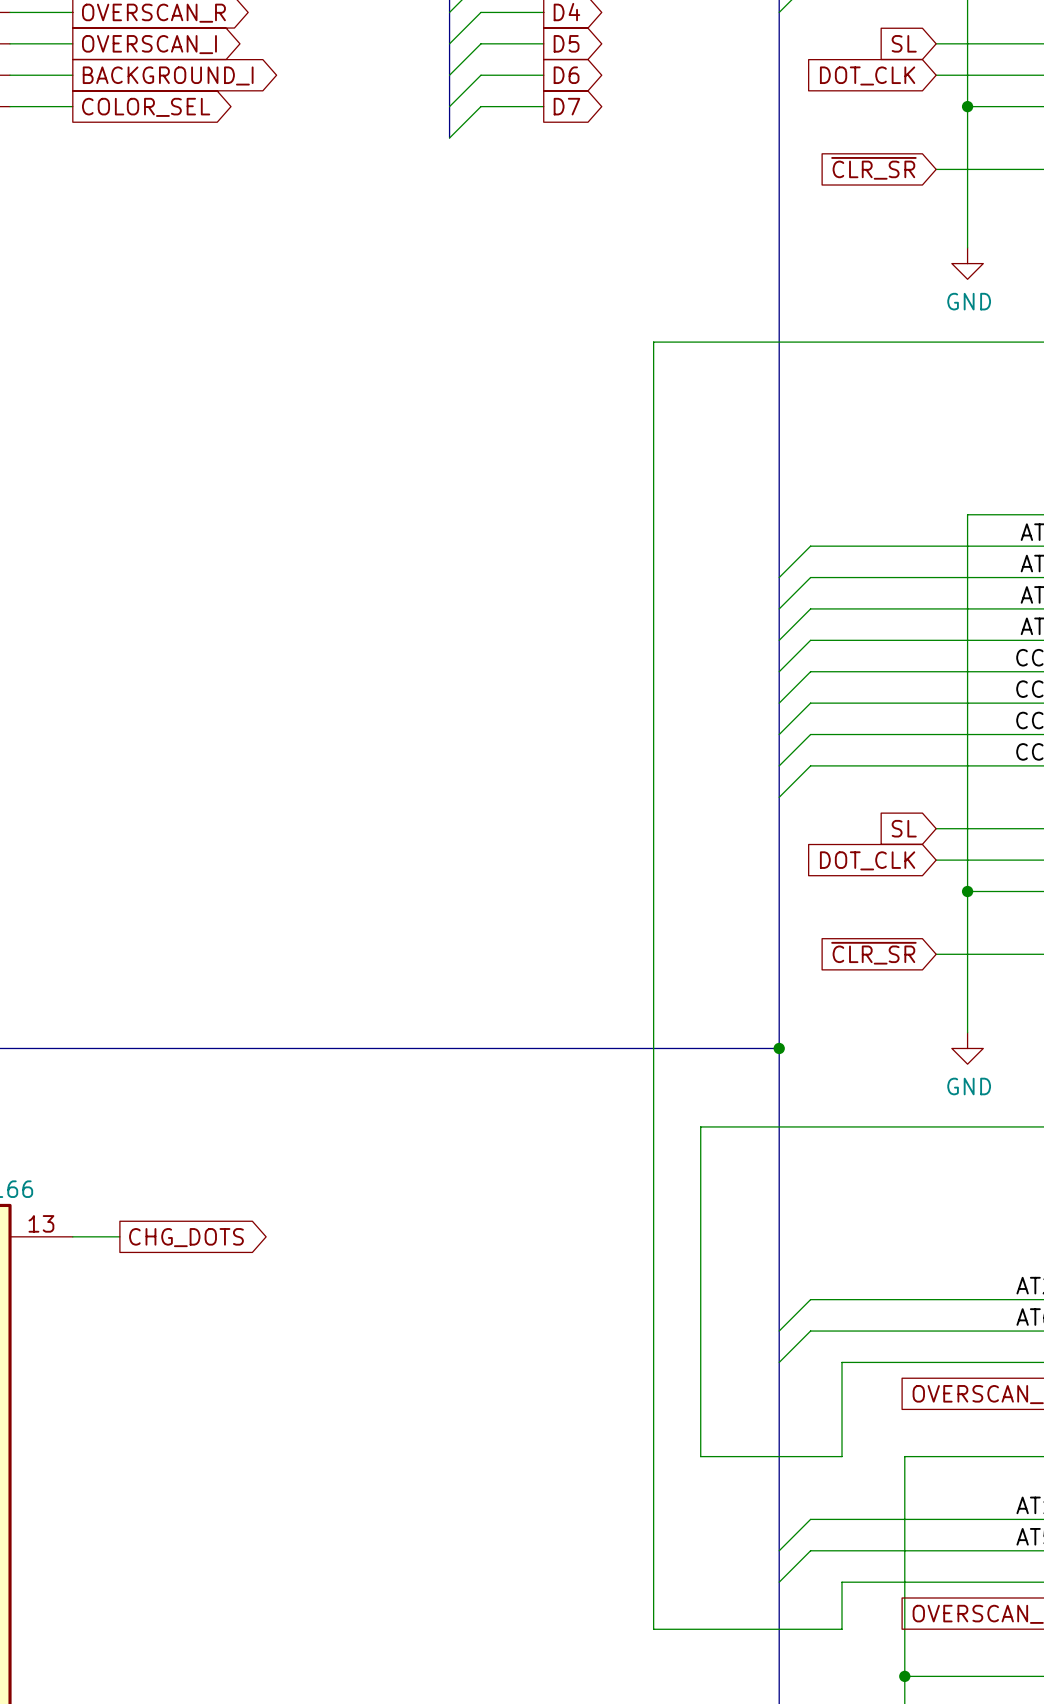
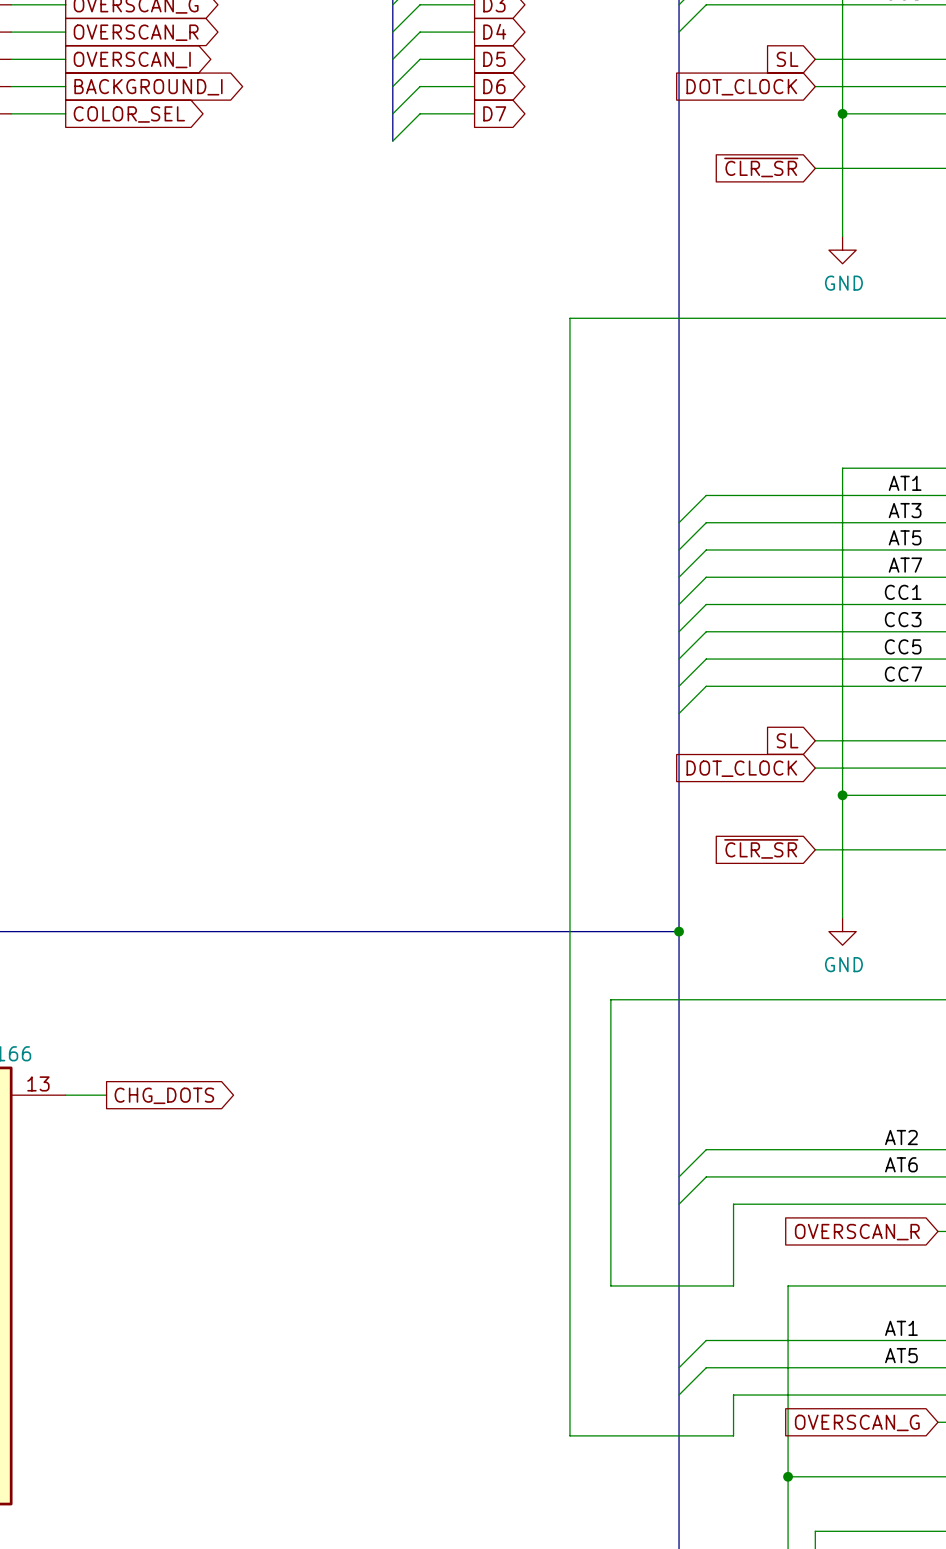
global label: DOT_CLK (867, 75) -> DOT_CLOCK (741, 87)
global label: DOT_CLK (867, 860) -> DOT_CLOCK (741, 768)

